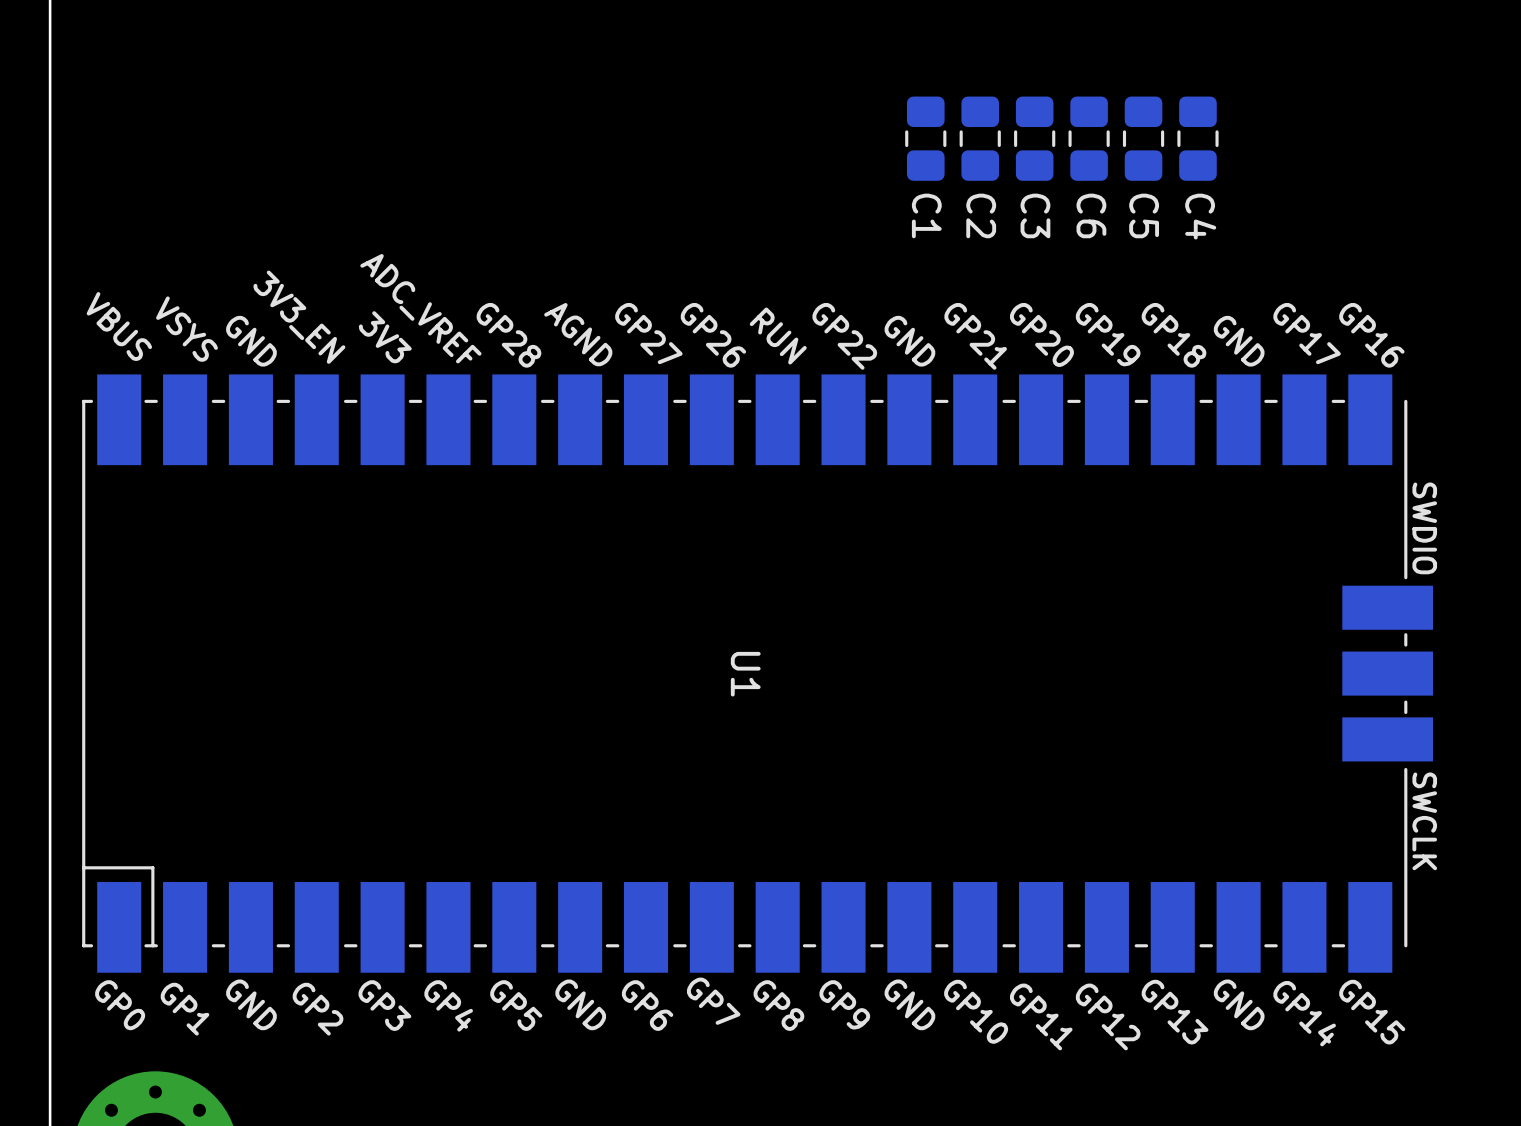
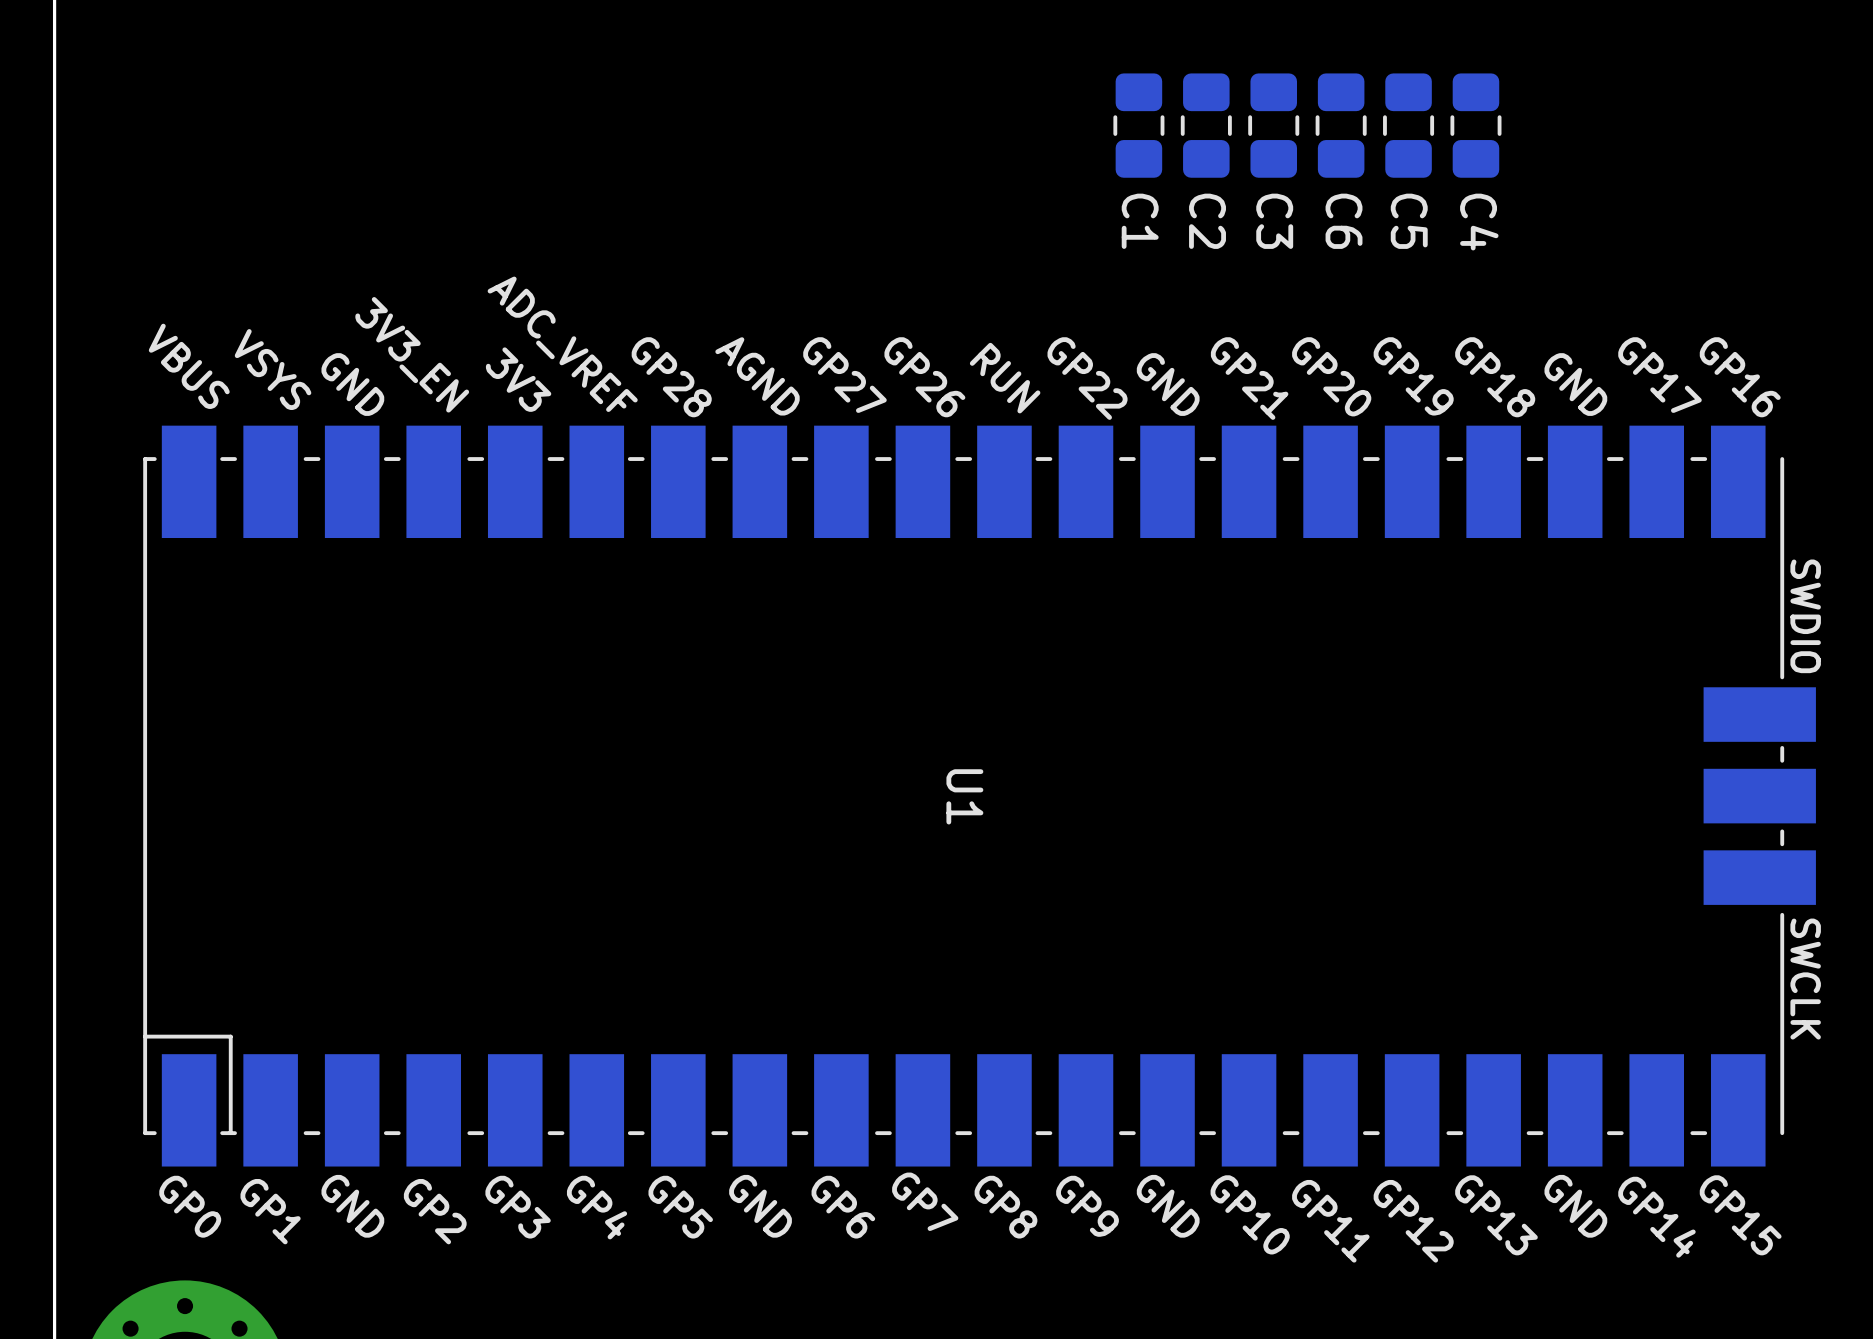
U1 position: (757, 673) -> (979, 796)

